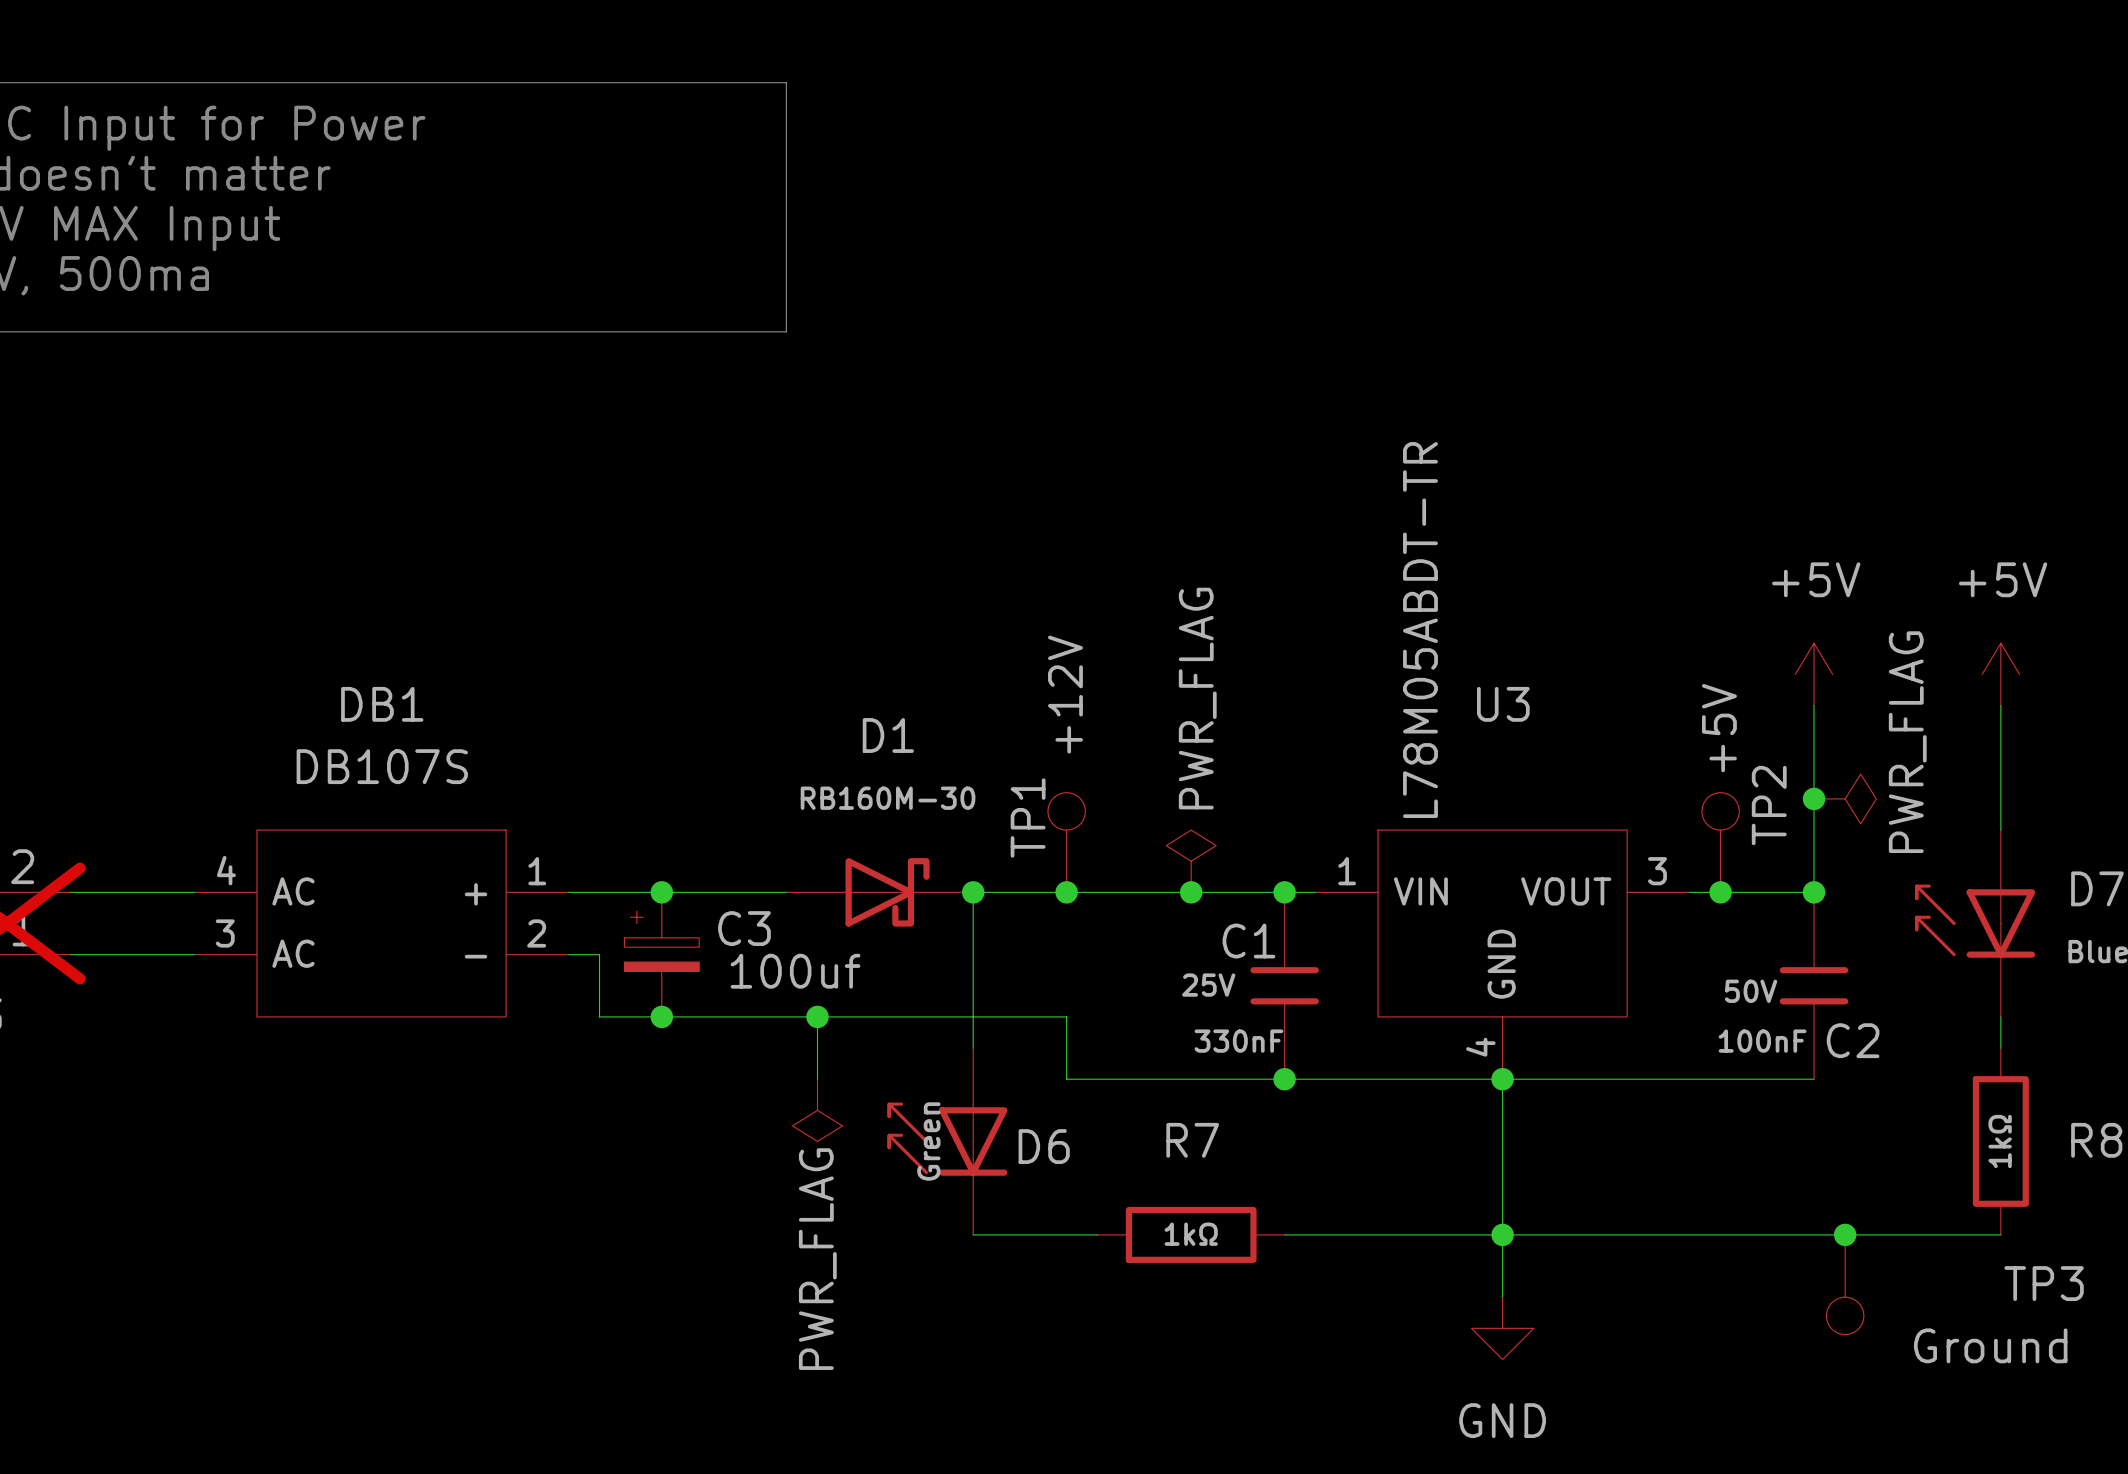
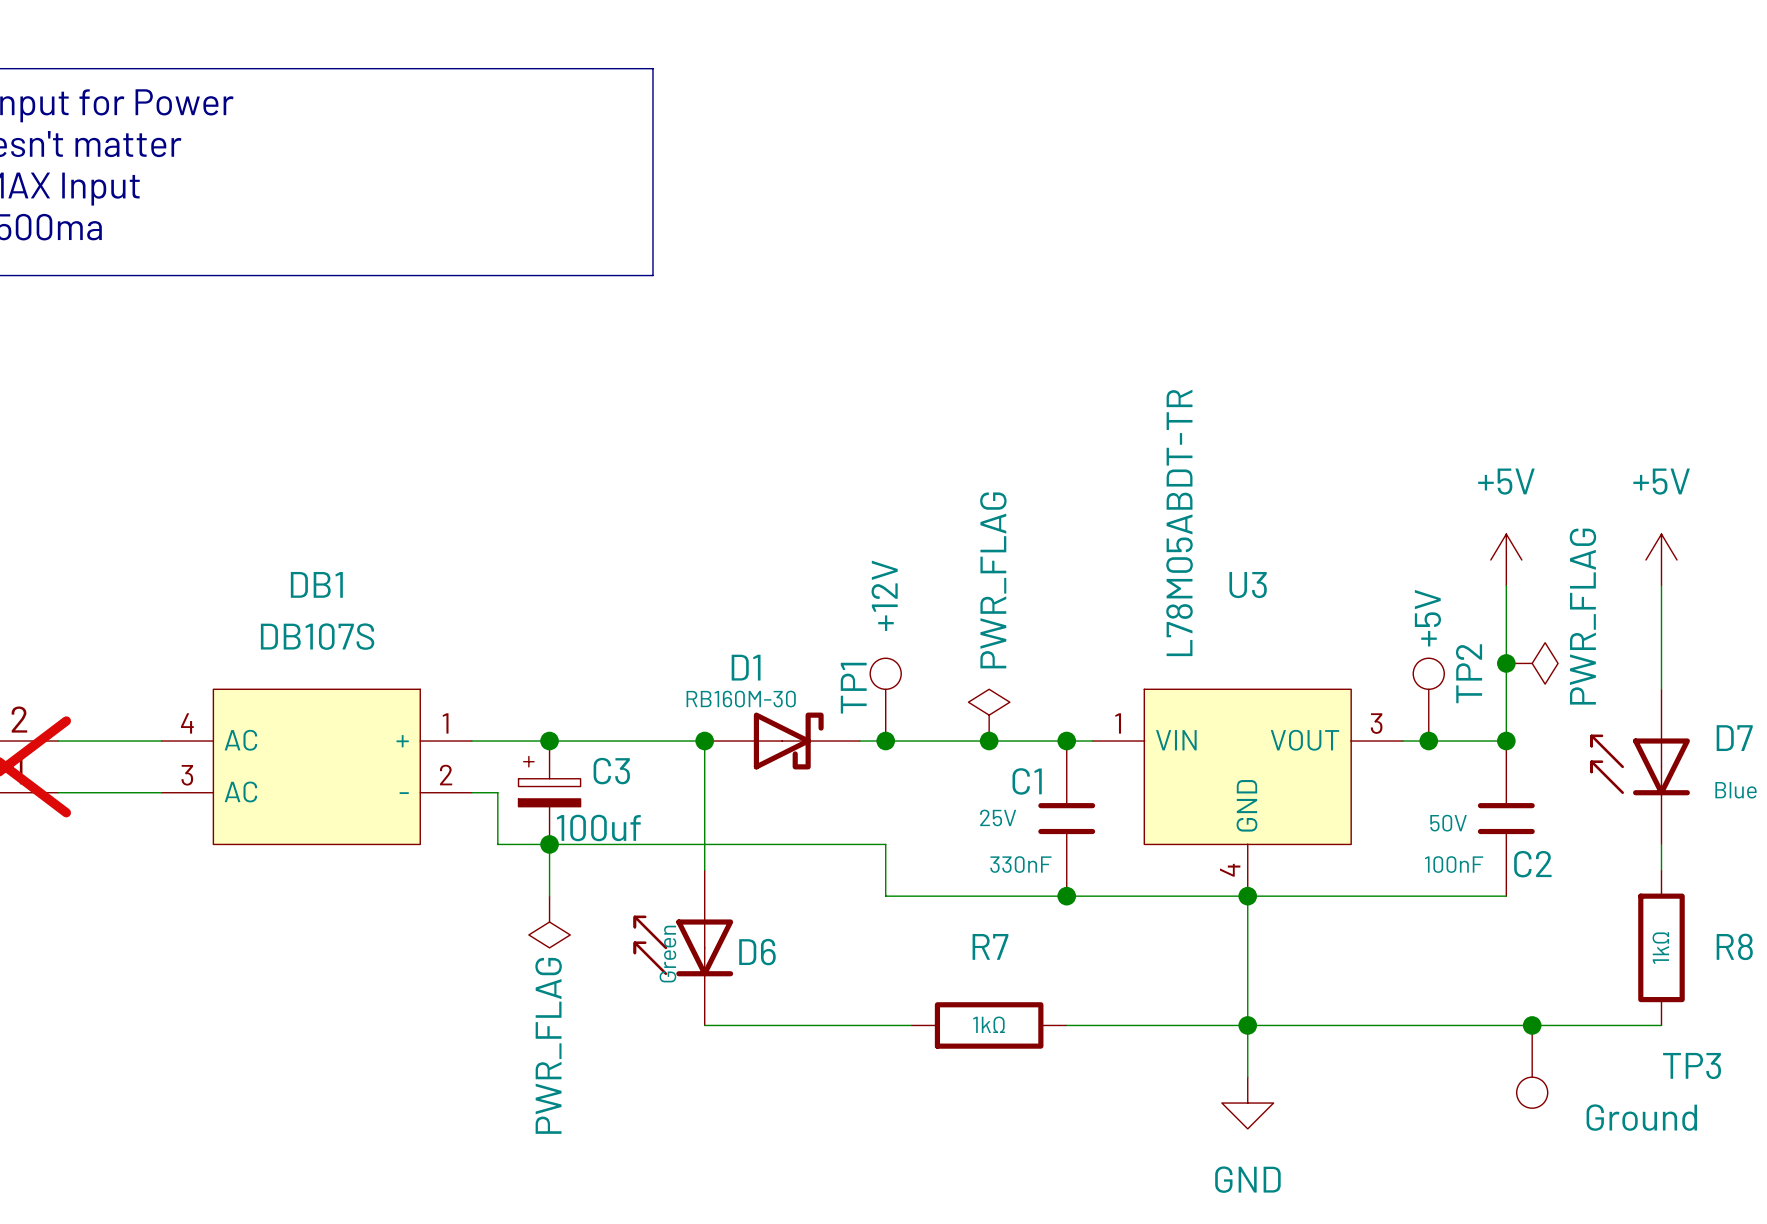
D1 name position: D1 (888, 735) -> D1 (746, 667)
D1 value position: RB160M-30 (888, 798) -> RB160M-30 (741, 699)
wire: none -> (652, 741) (704, 741) (704, 870)
junction: none -> (704, 741)
D1 position: (879, 892) -> (782, 741)
junction: (973, 892) -> none
wire: (1035, 892) (973, 892) (973, 1048) -> none
C3 value position: 100uf (795, 971) -> 100uf (598, 827)
wire: (817, 1016) (817, 1079) -> (549, 844) (549, 896)
junction: (817, 1016) -> none
power symbol position: PWR_FLAG (817, 1110) -> PWR_FLAG (549, 922)
D6 position: (947, 1141) -> (683, 947)
wire: none -> (704, 1025) (808, 1025)

